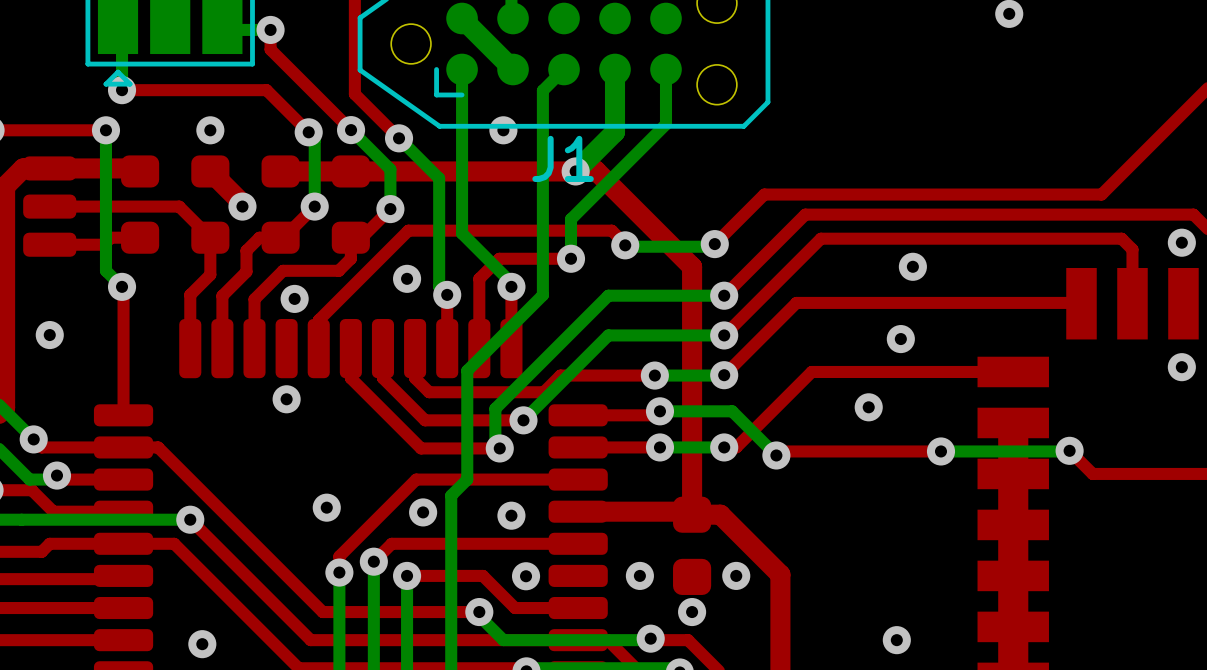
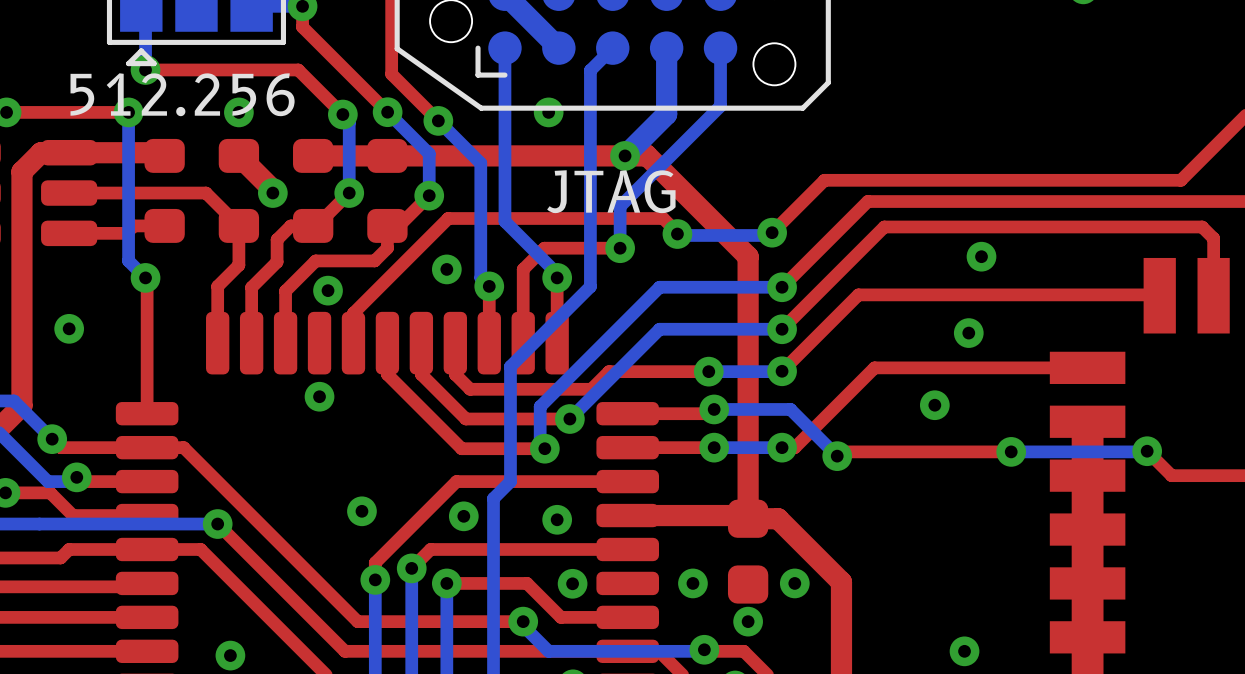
text: none -> 512.256 (182, 94)
J1 name: J1 (563, 158) -> none
J1 value: none -> JTAG (611, 191)

